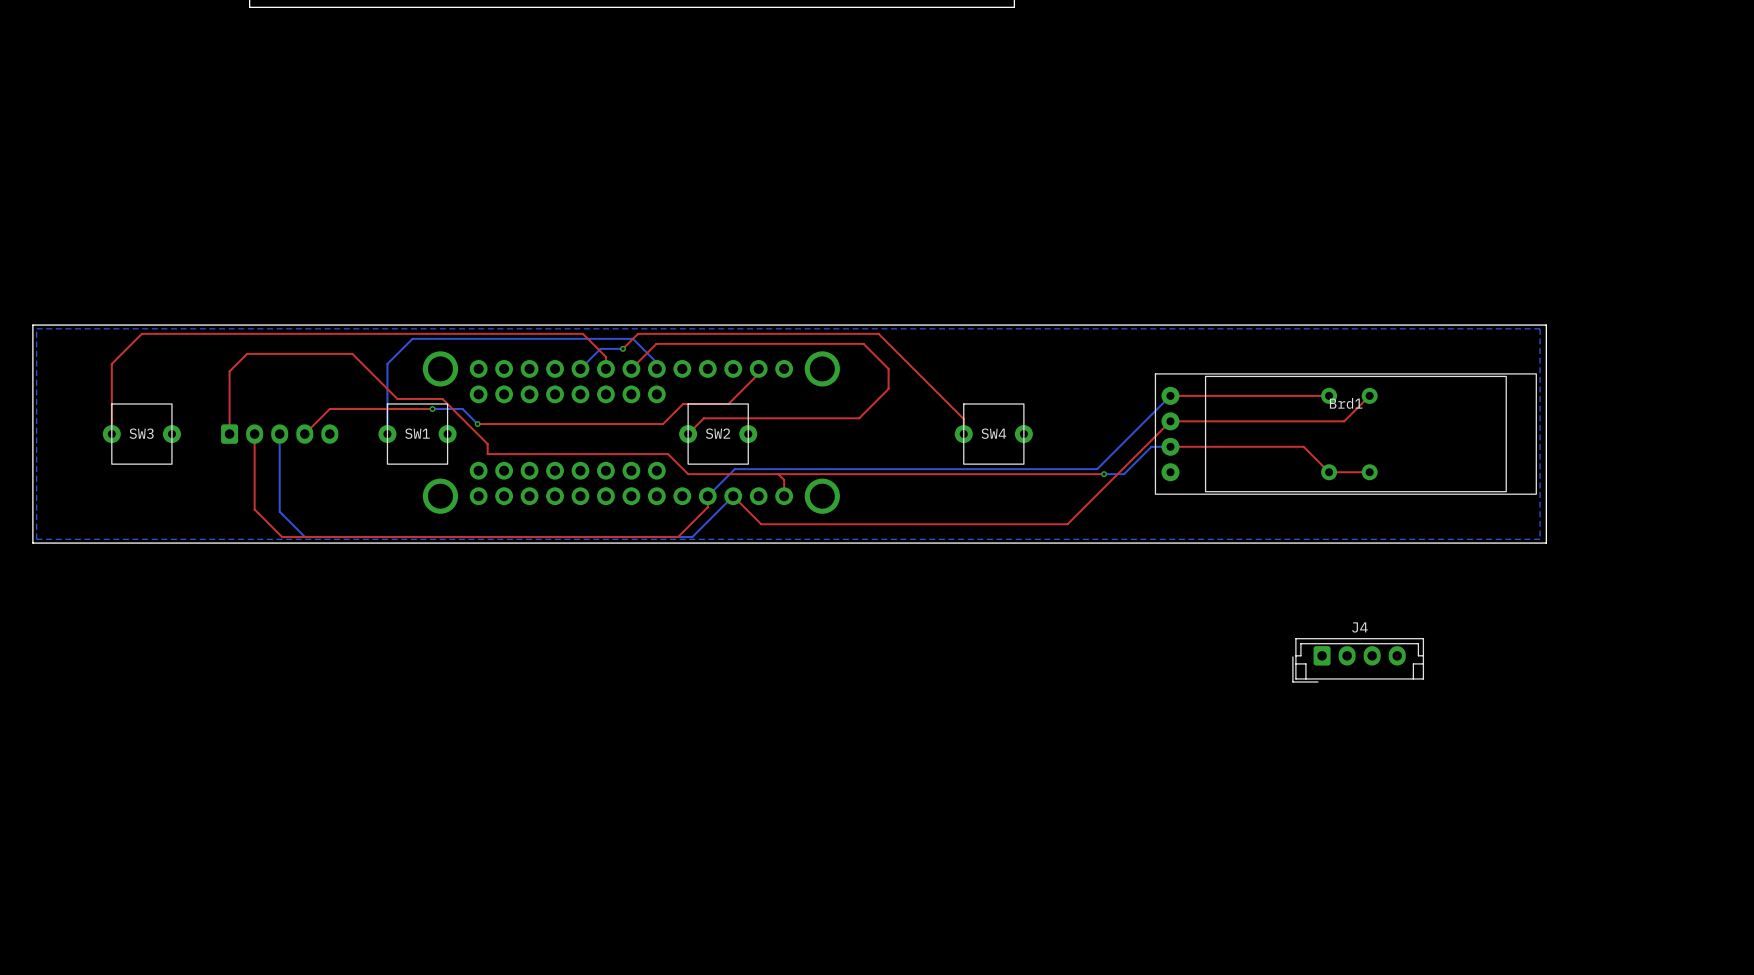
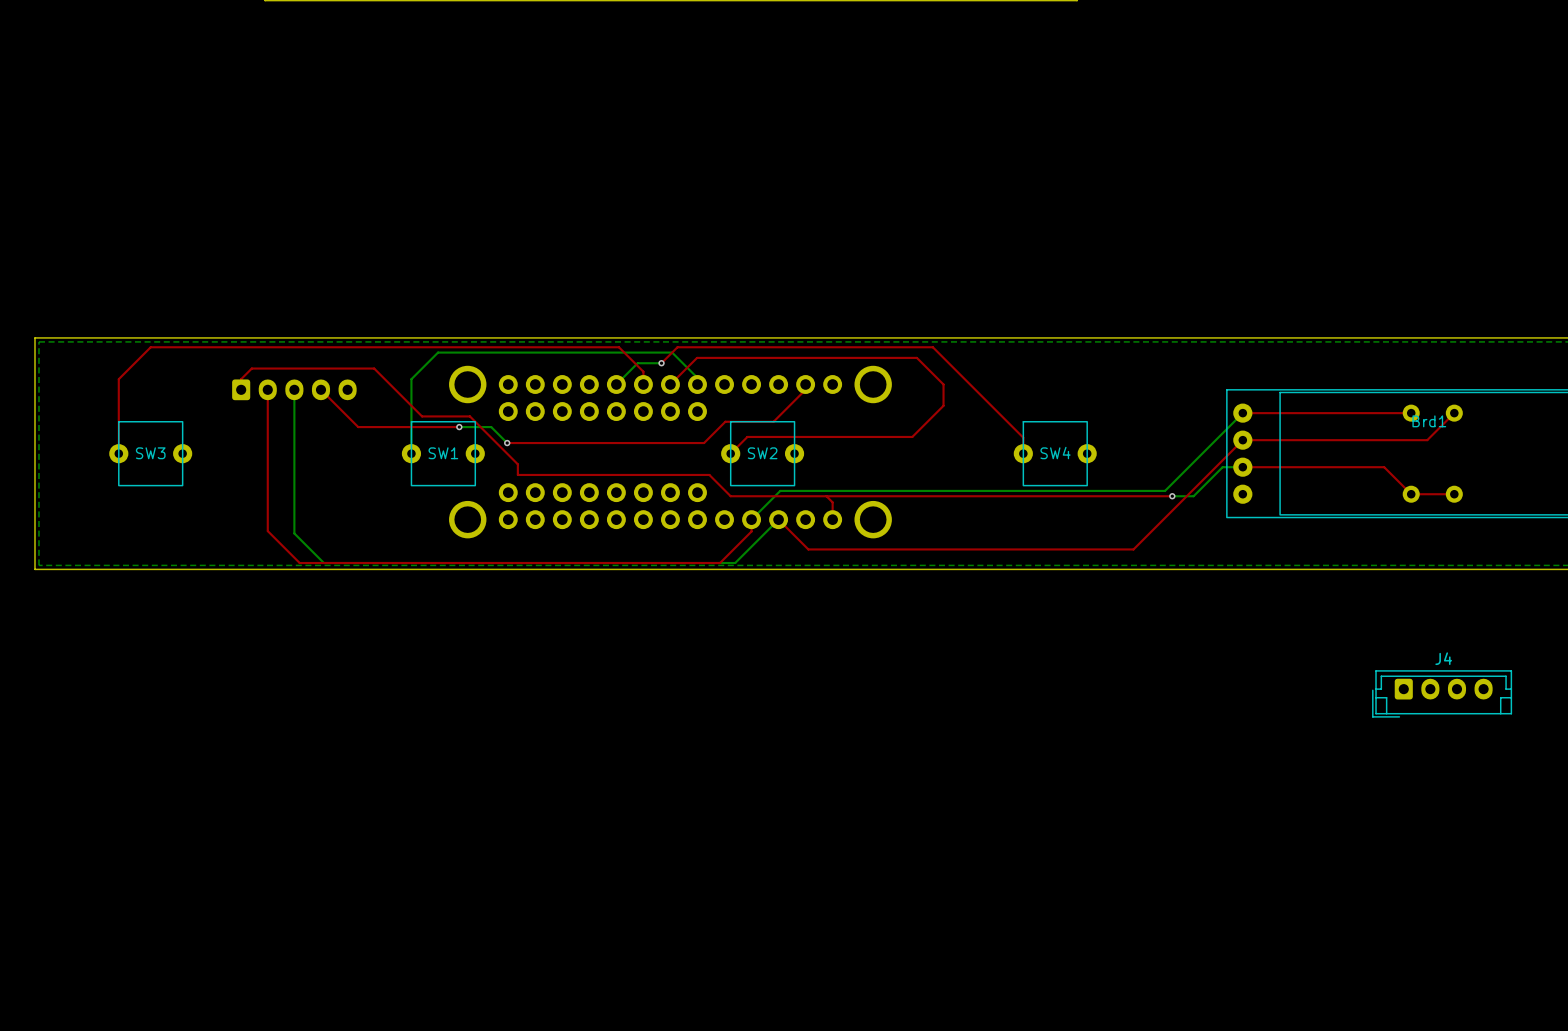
top track: (247, 353) (229, 371) (229, 434) -> (262, 368) (251, 368) (241, 379) (241, 389)
top track: (337, 409) (329, 409) (304, 434) -> (358, 427) (320, 389)
top track: (254, 434) (254, 509) -> (267, 389) (267, 531) (270, 533)
bottom track: (279, 434) (279, 511) -> (294, 389) (294, 533) (297, 536)
part position: (279, 434) -> (294, 389)

